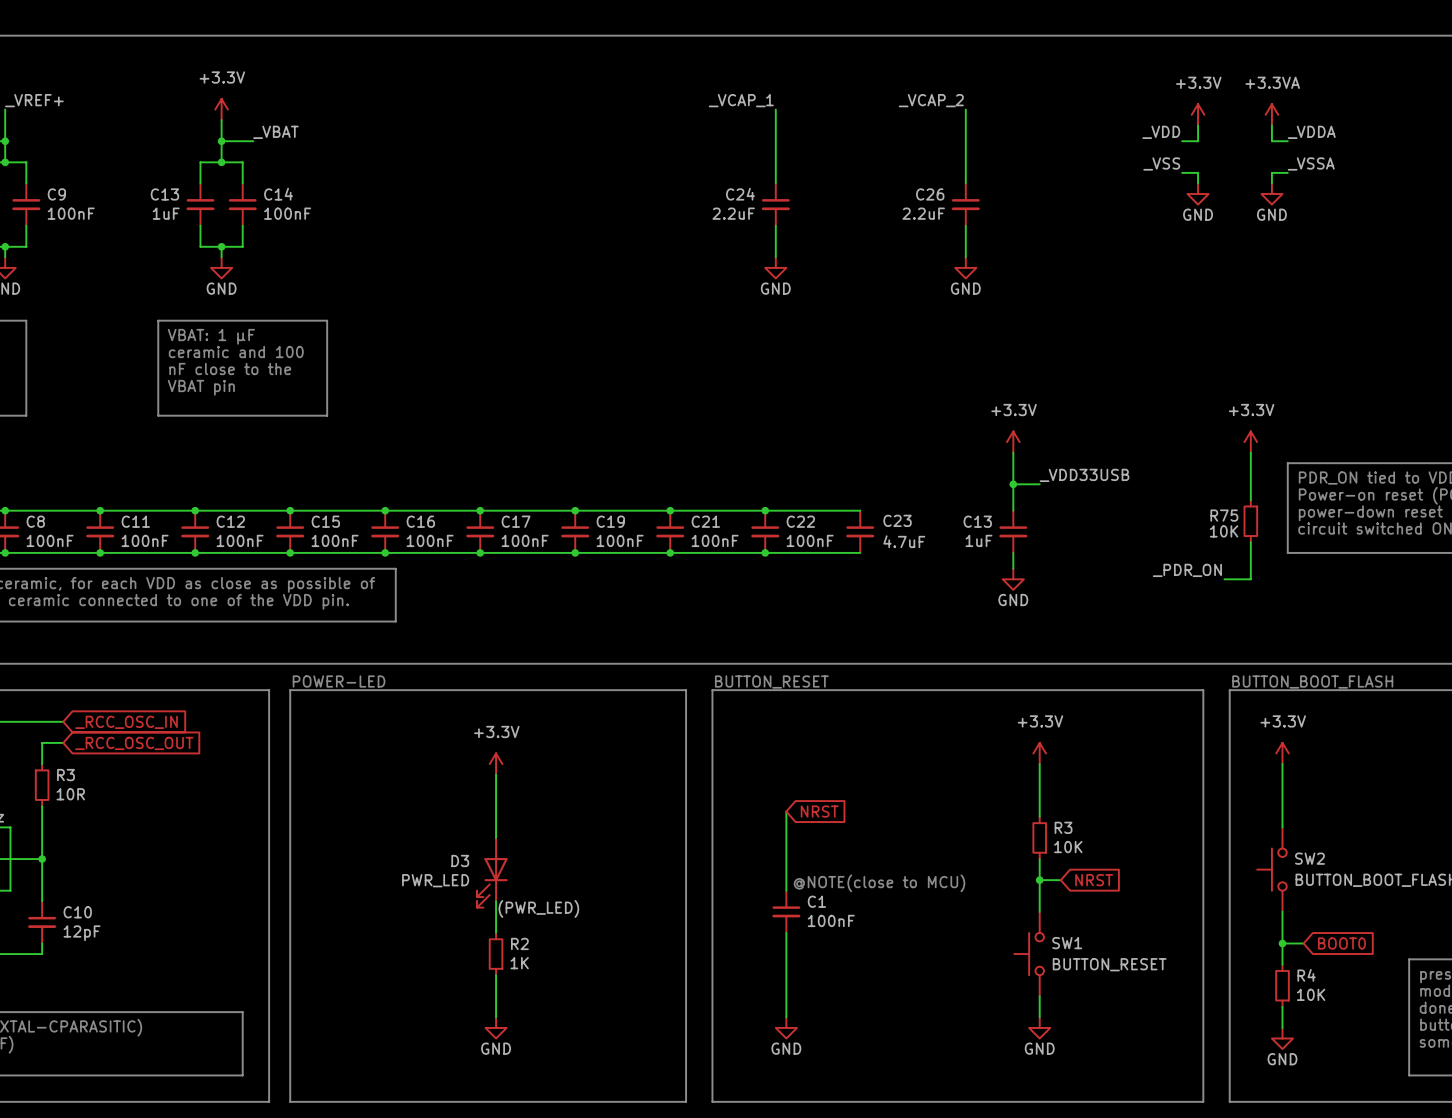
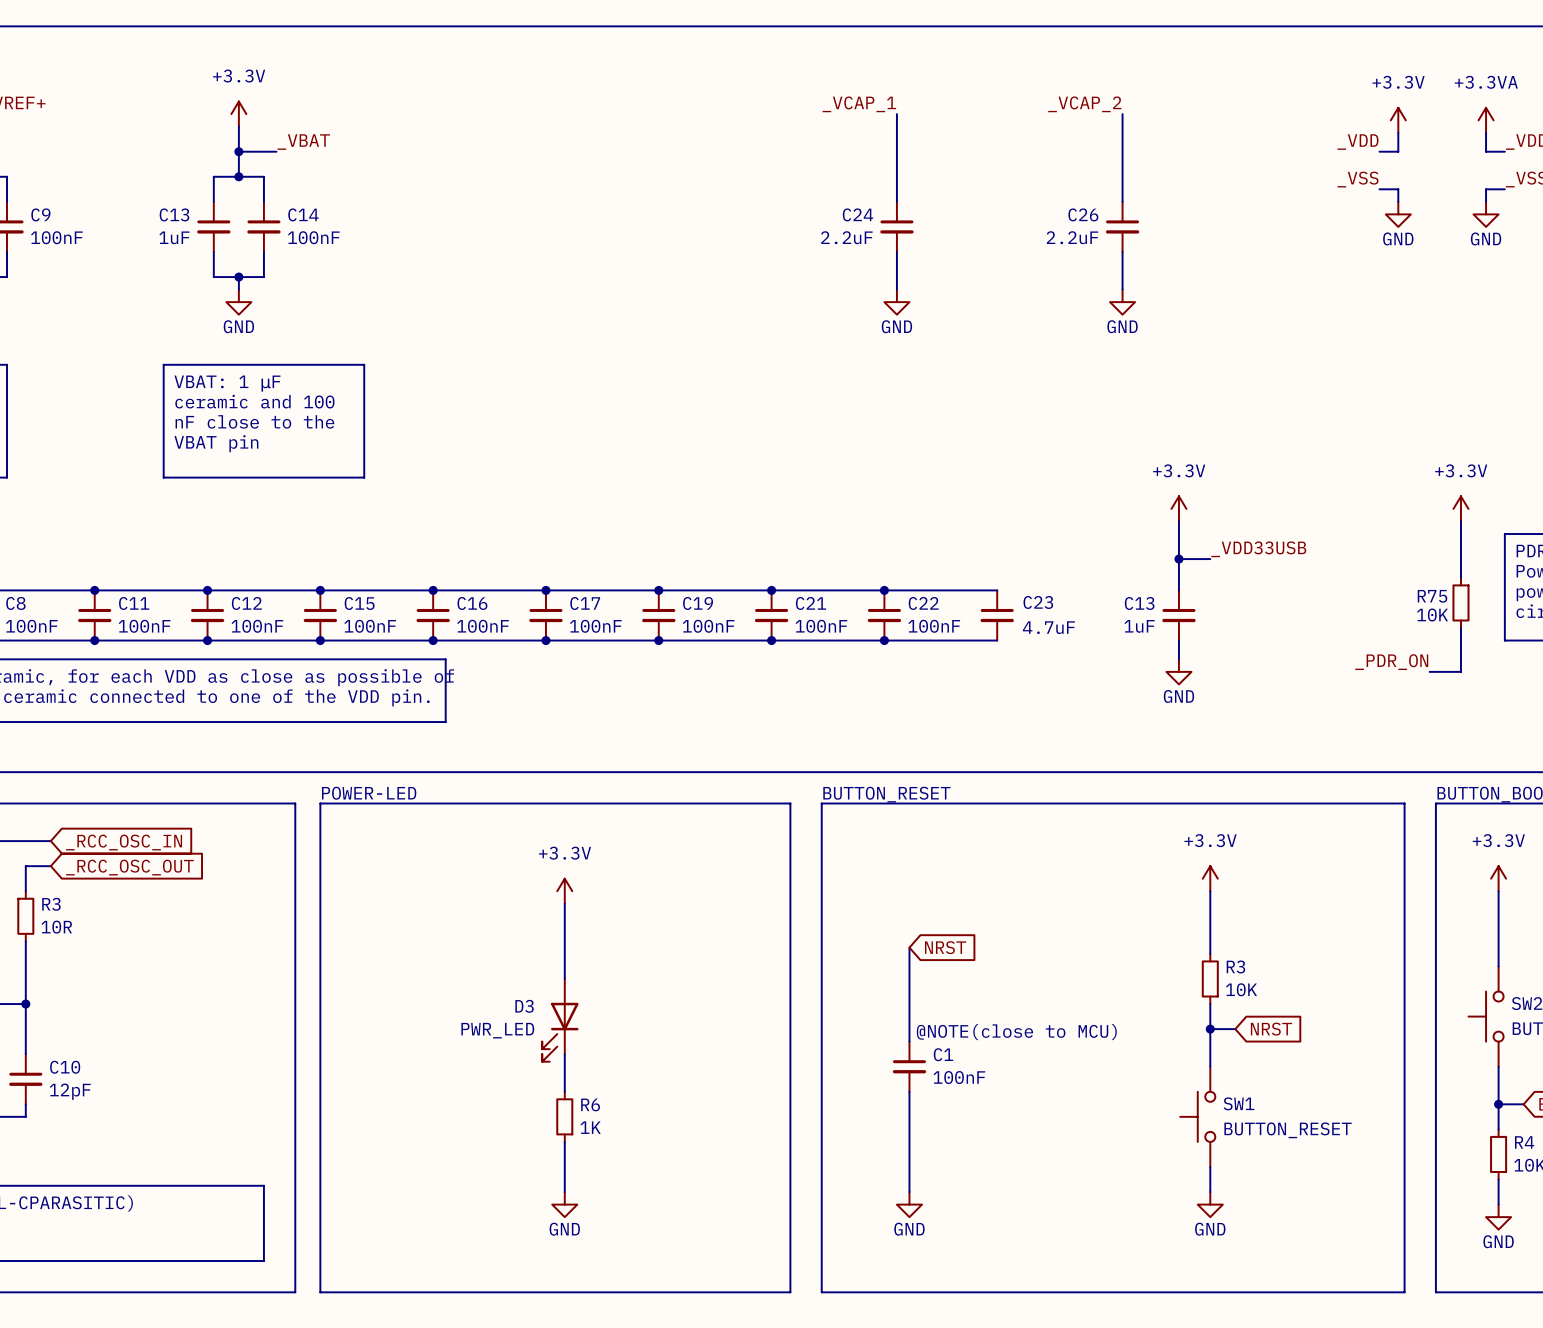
label: (PWR_LED) (538, 908) -> none
R2 name: R2 (519, 943) -> R6 (590, 1104)

